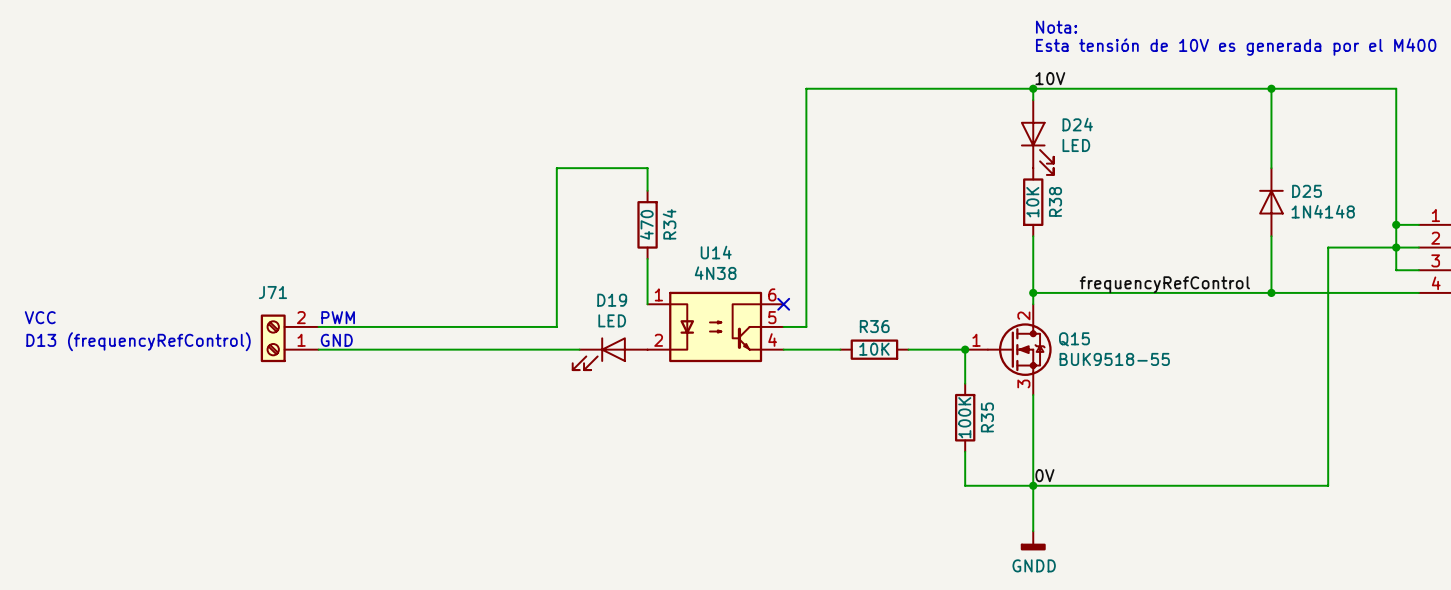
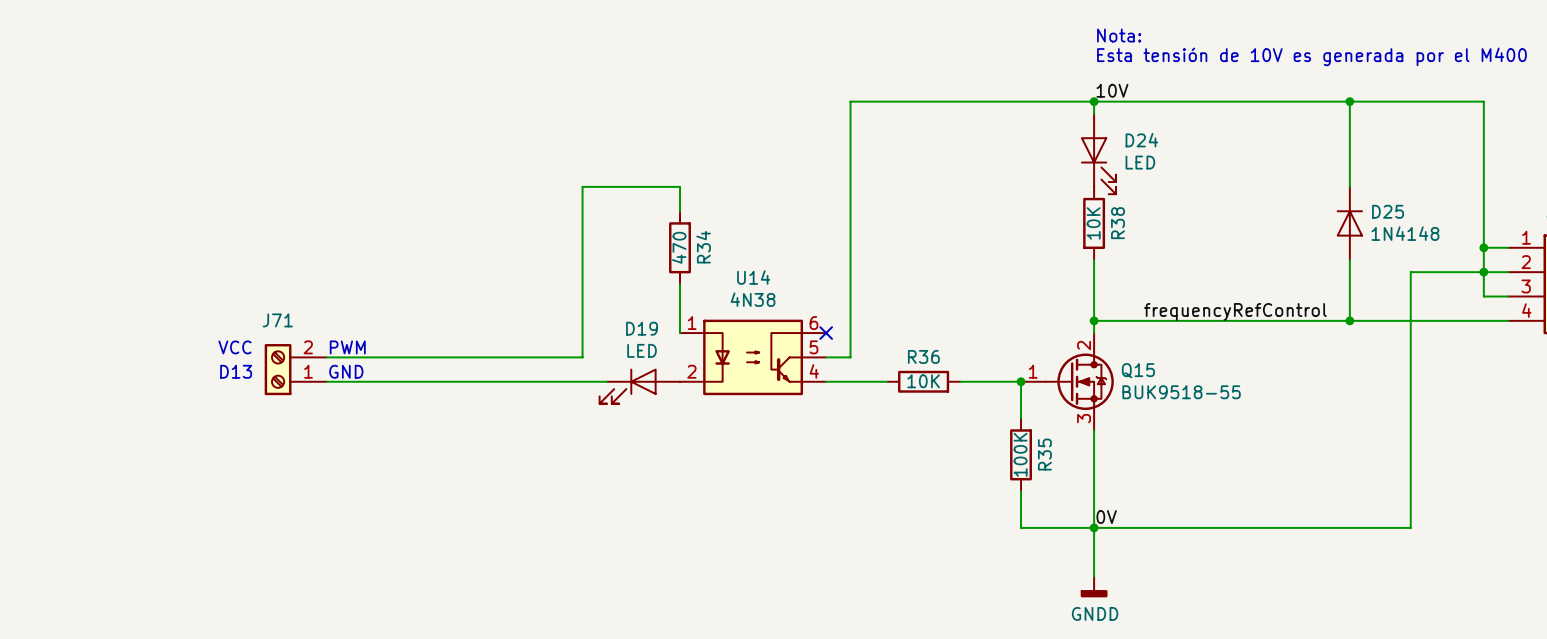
text position: VCC (40, 317) -> VCC (234, 347)
text: none -> D13 (236, 371)
text: D13 (frequencyRefControl) (138, 341) -> none

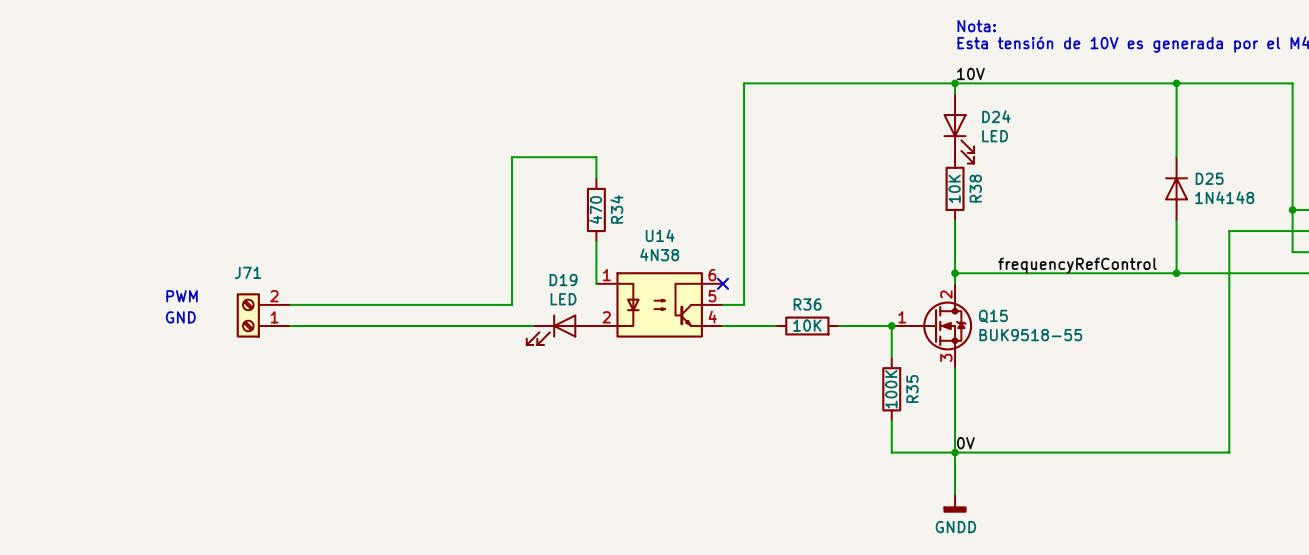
junction: (1483, 272) -> none
text: VCC (234, 347) -> none
text position: PWM (347, 347) -> PWM (182, 296)
text: D13 (236, 371) -> none
text position: GND (346, 371) -> GND (180, 317)

